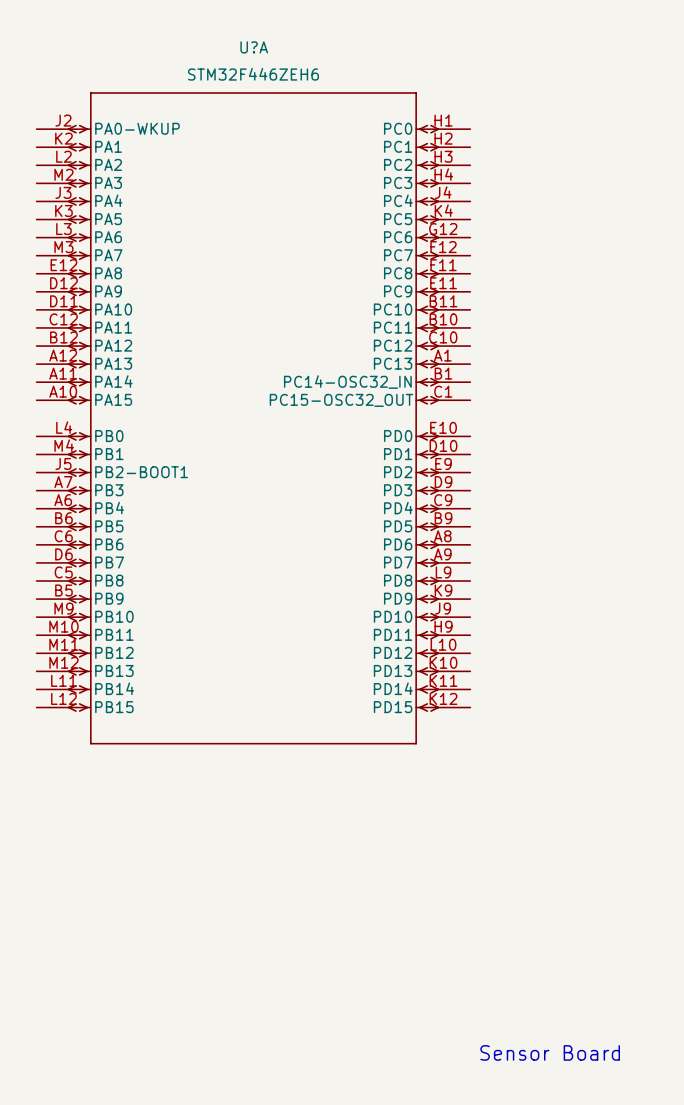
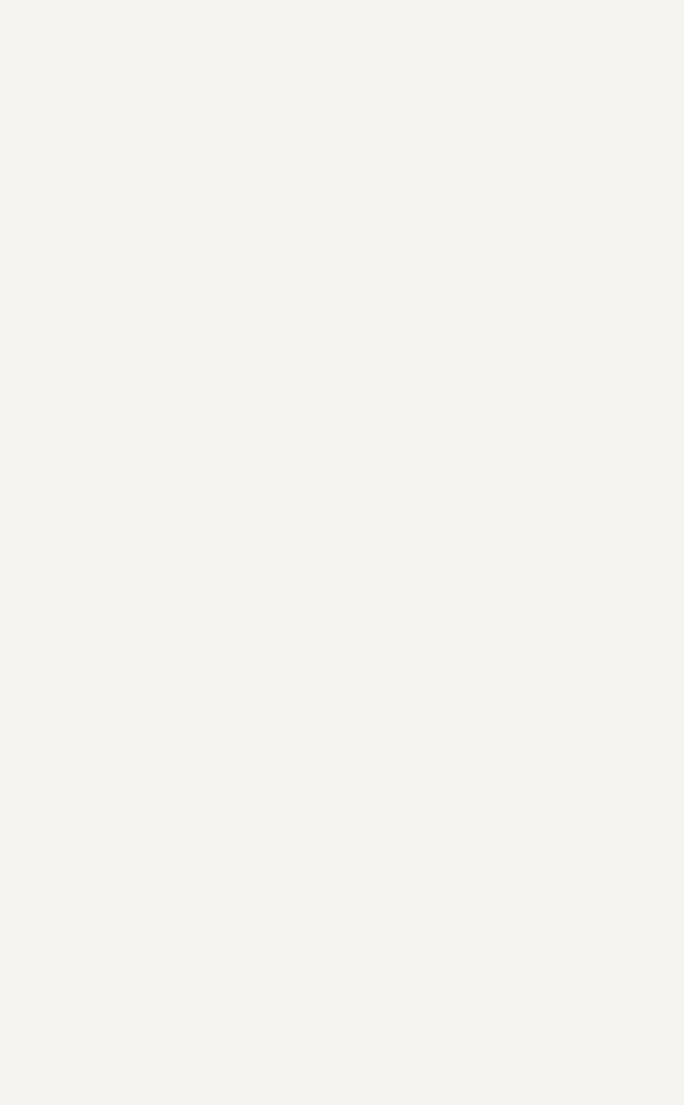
U?A: STM32F446ZEH6 (253, 418) -> none
text: Sensor Board (550, 1052) -> none

